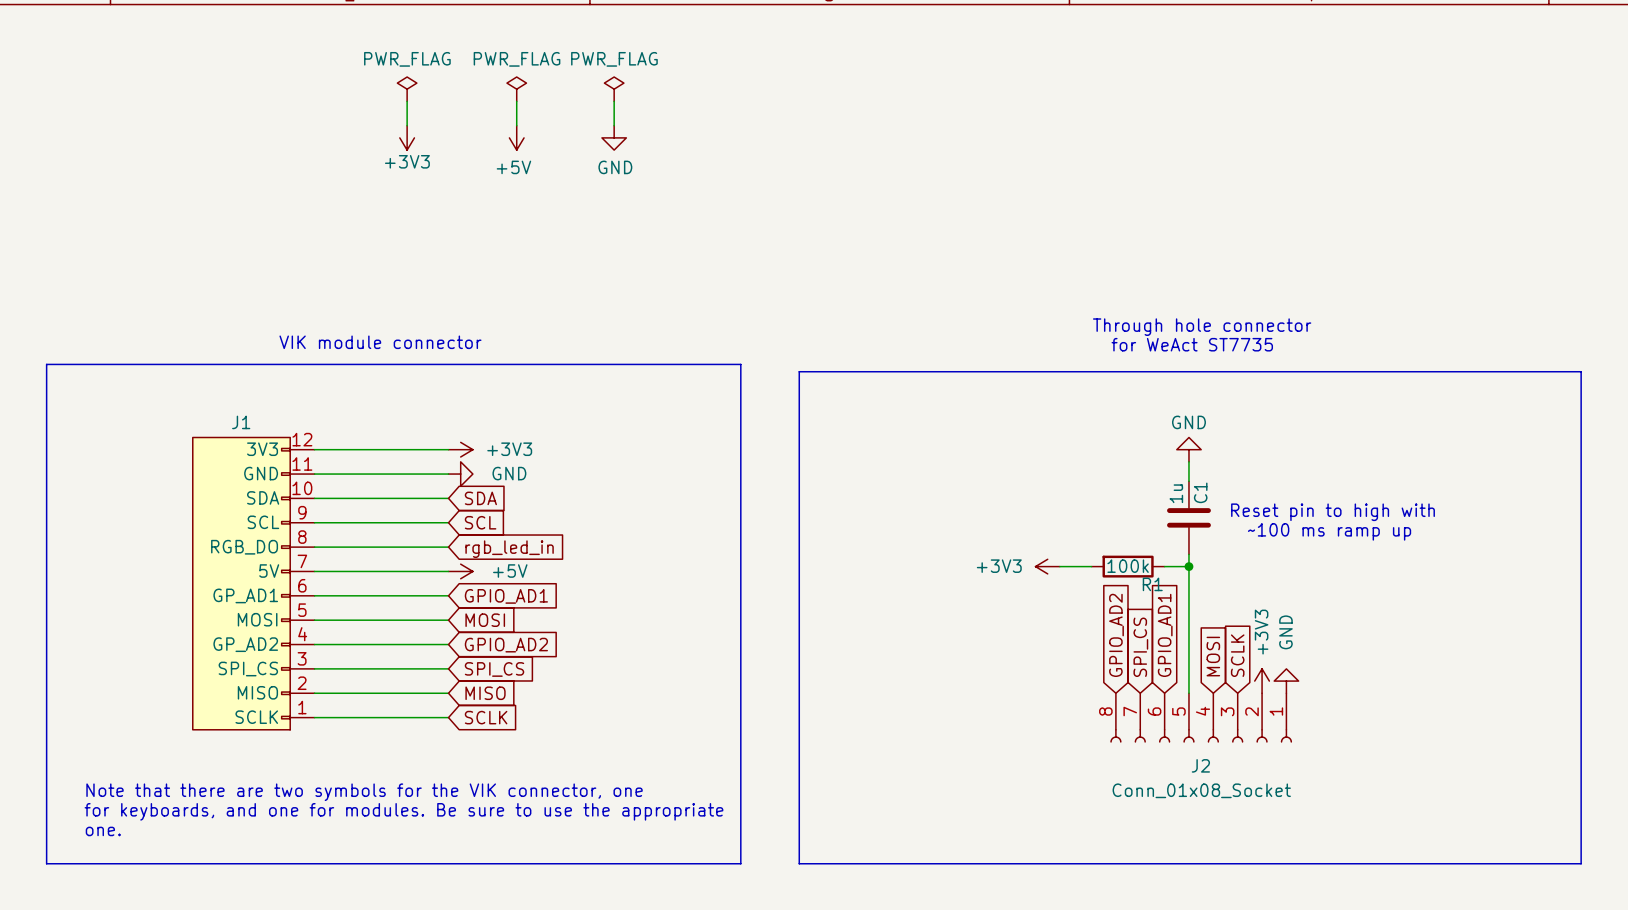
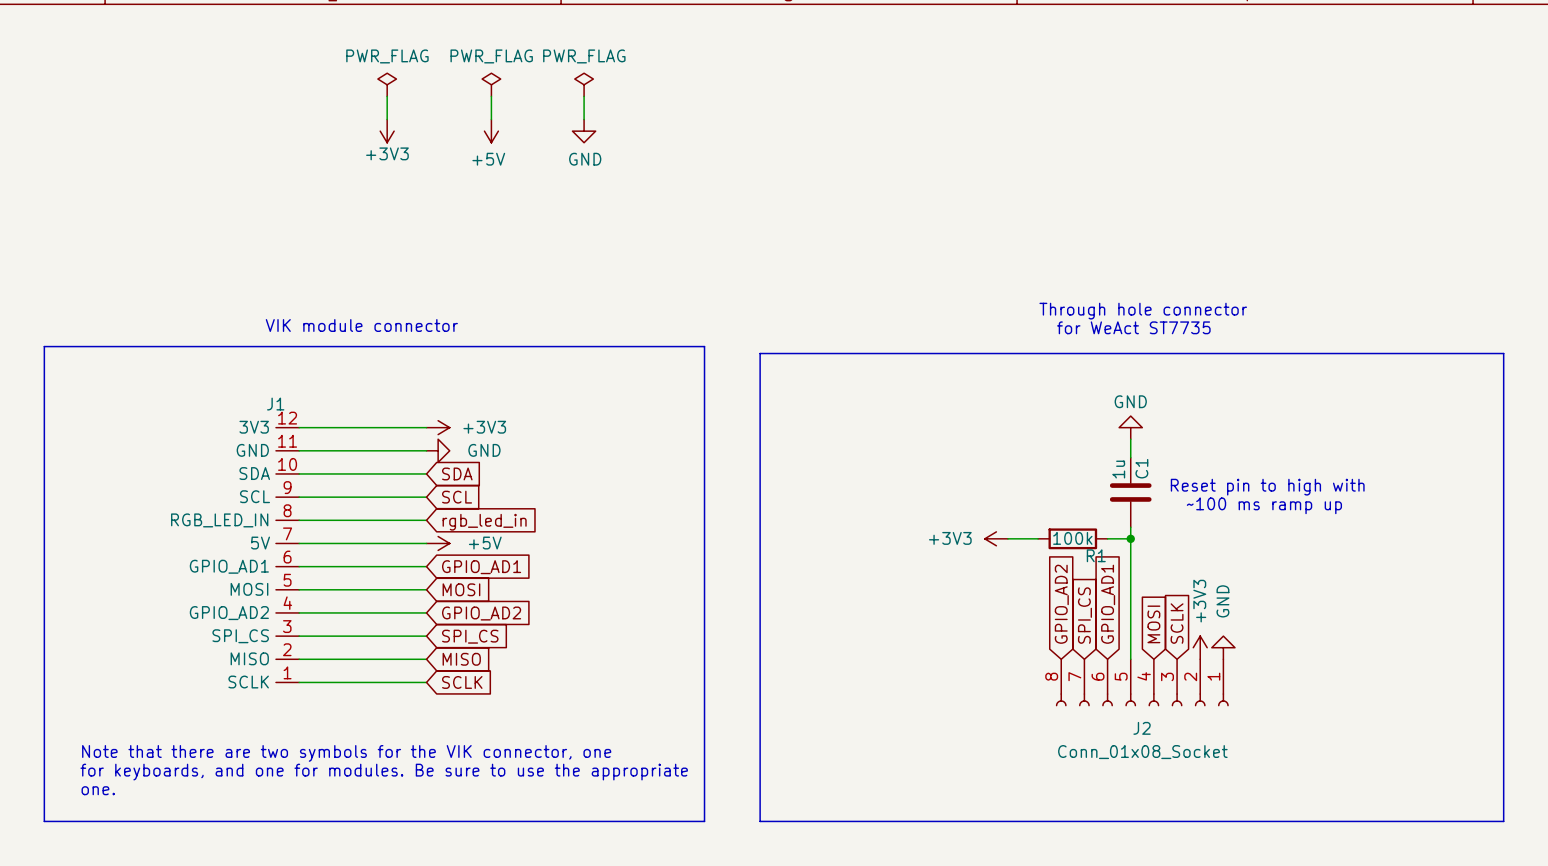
J1 symbol: [192, 437, 315, 730] -> [275, 427, 300, 683]

